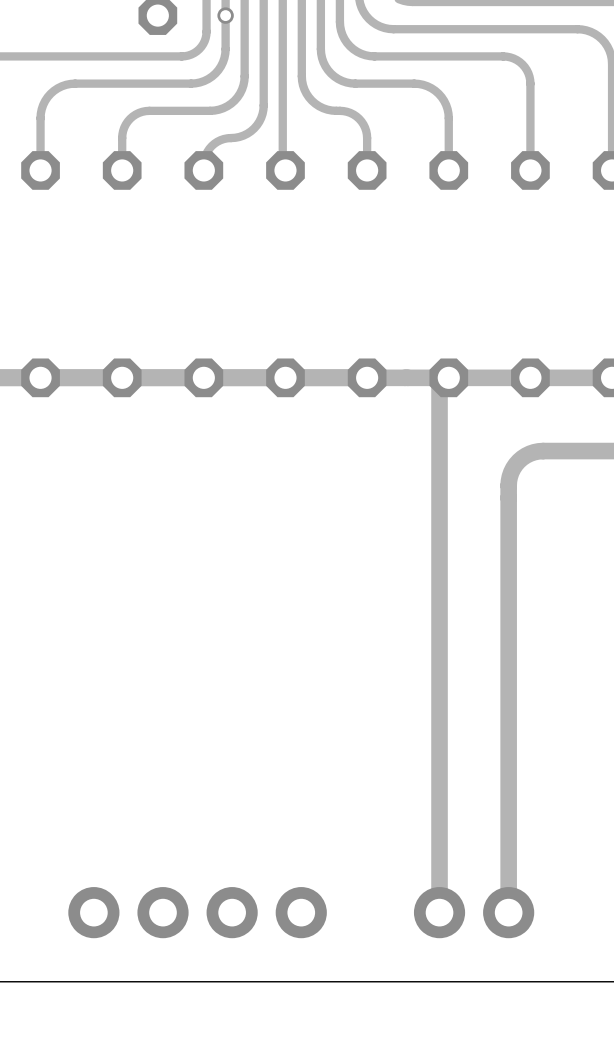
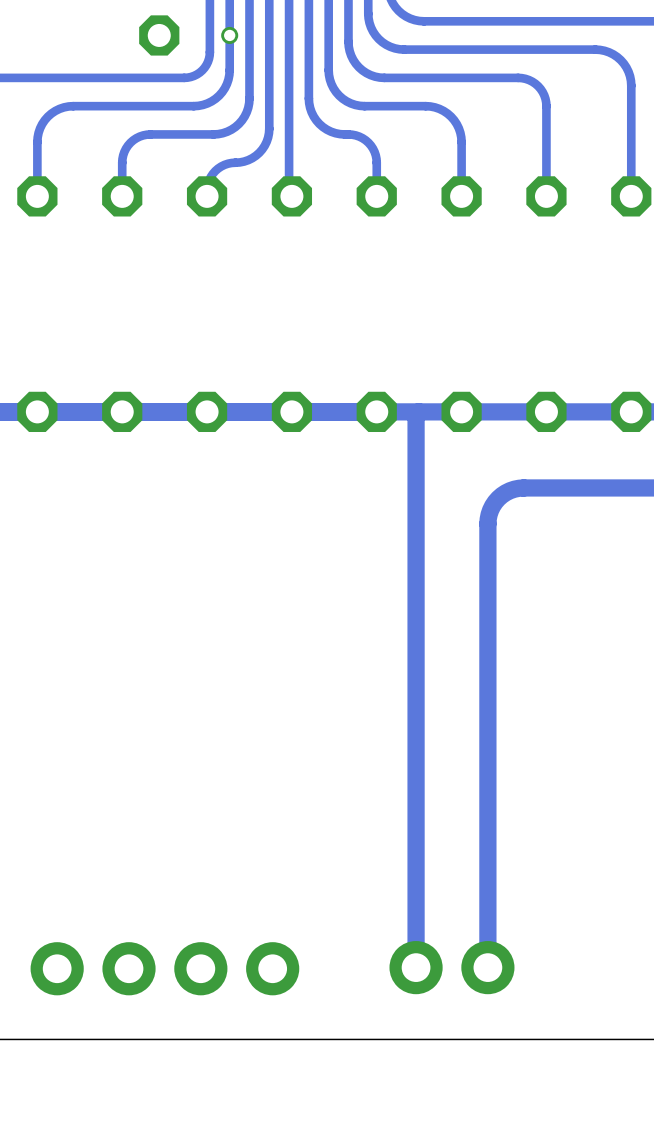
track: none -> (419, 411) (416, 414) (416, 975)
track: (439, 377) (439, 919) -> none
track: (543, 451) (529, 453) (518, 461) (511, 472) (508, 481) (508, 912) -> (559, 487) (523, 487) (510, 490) (495, 502) (488, 519) (487, 967)
part position: (197, 912) -> (164, 968)
part position: (474, 912) -> (451, 967)

